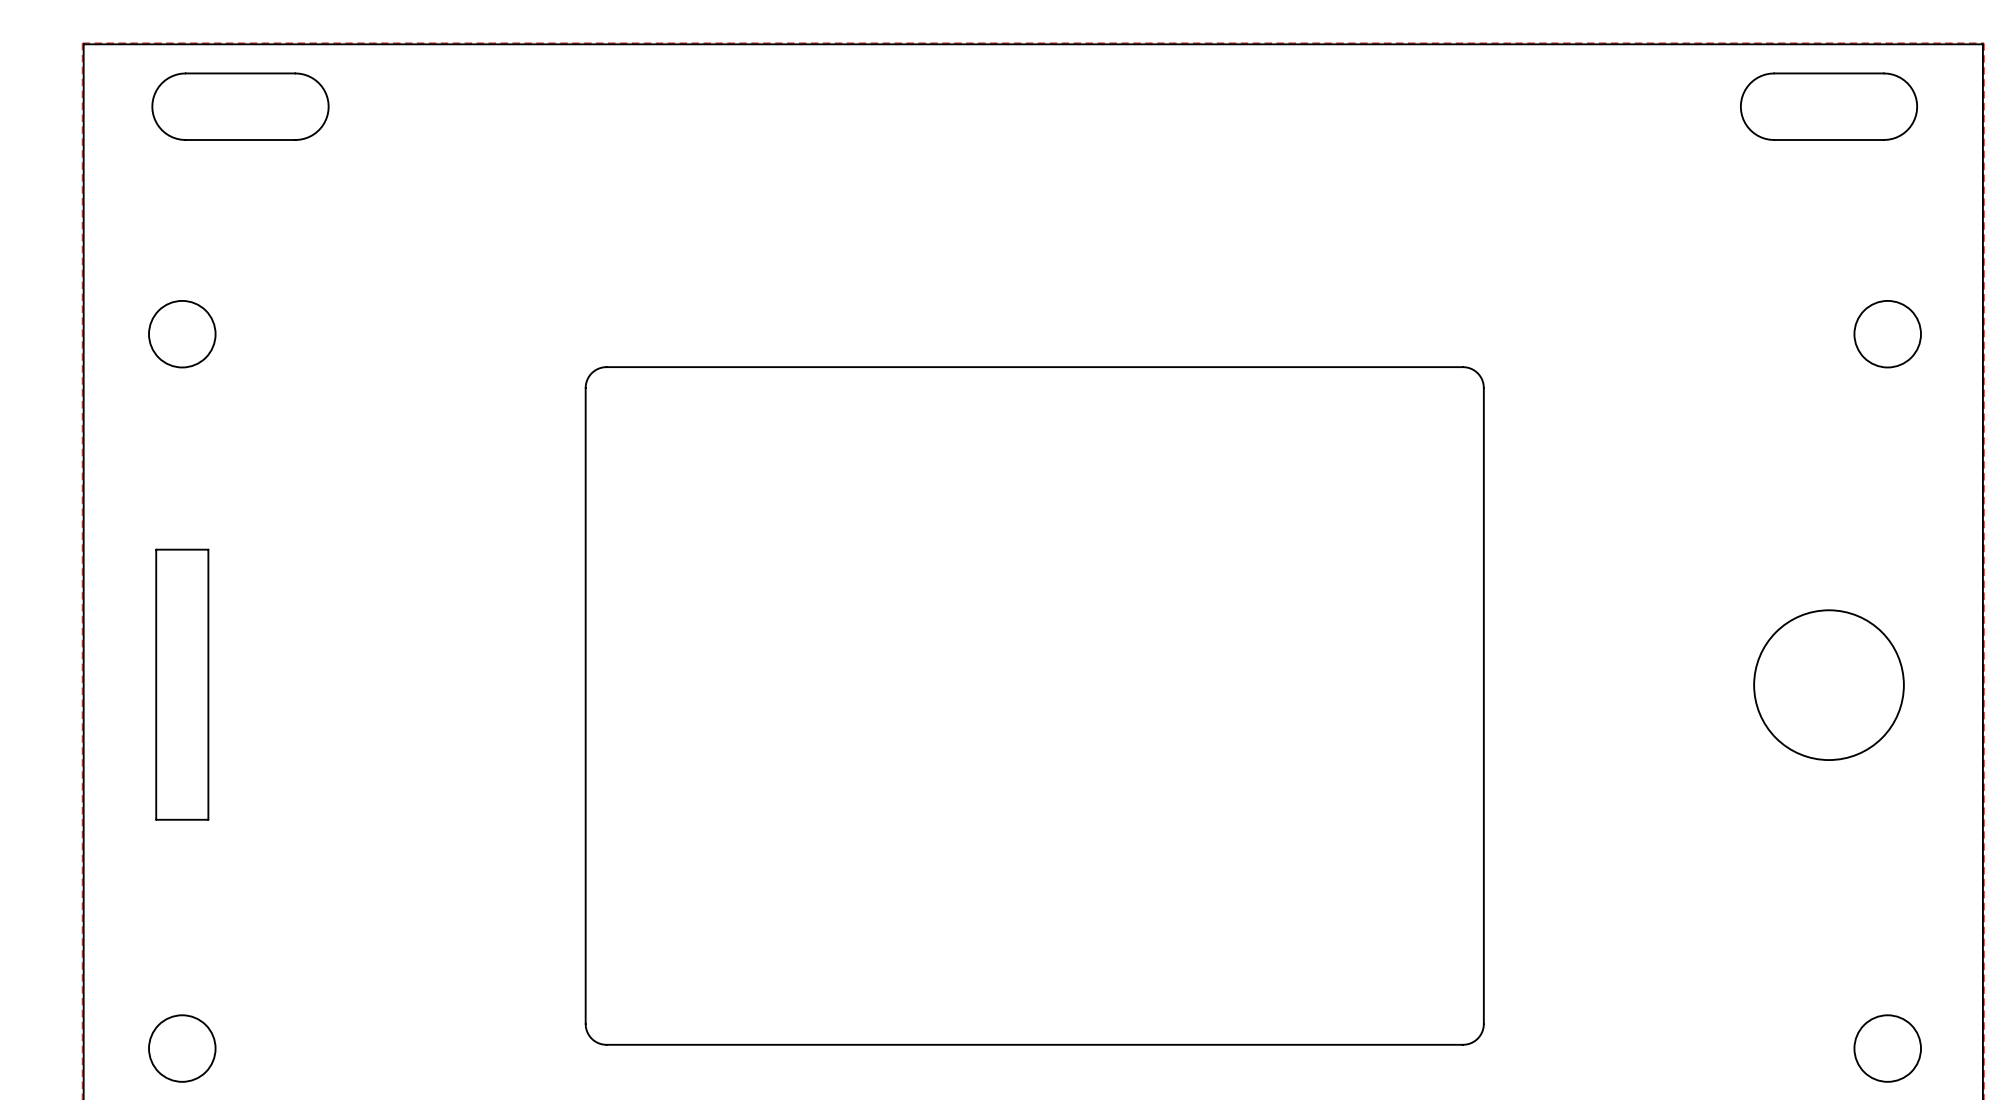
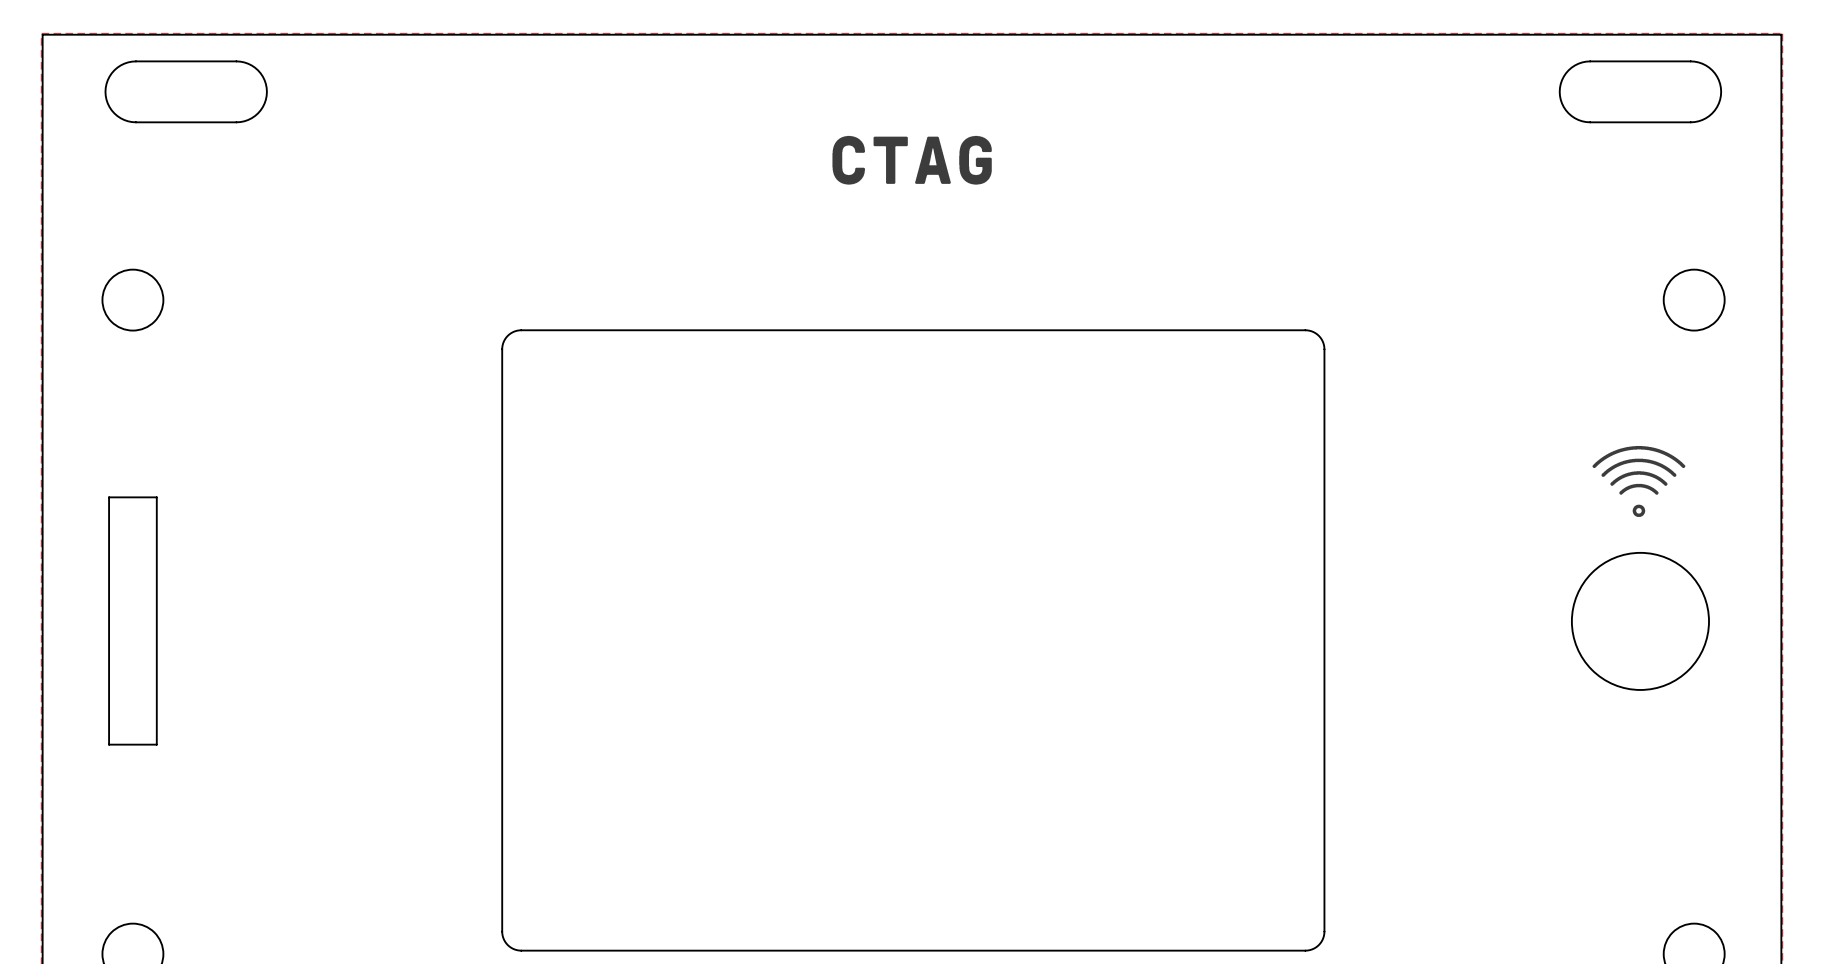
drawing: none -> [832, 135, 992, 185]
drawing: none -> [1592, 445, 1686, 517]

